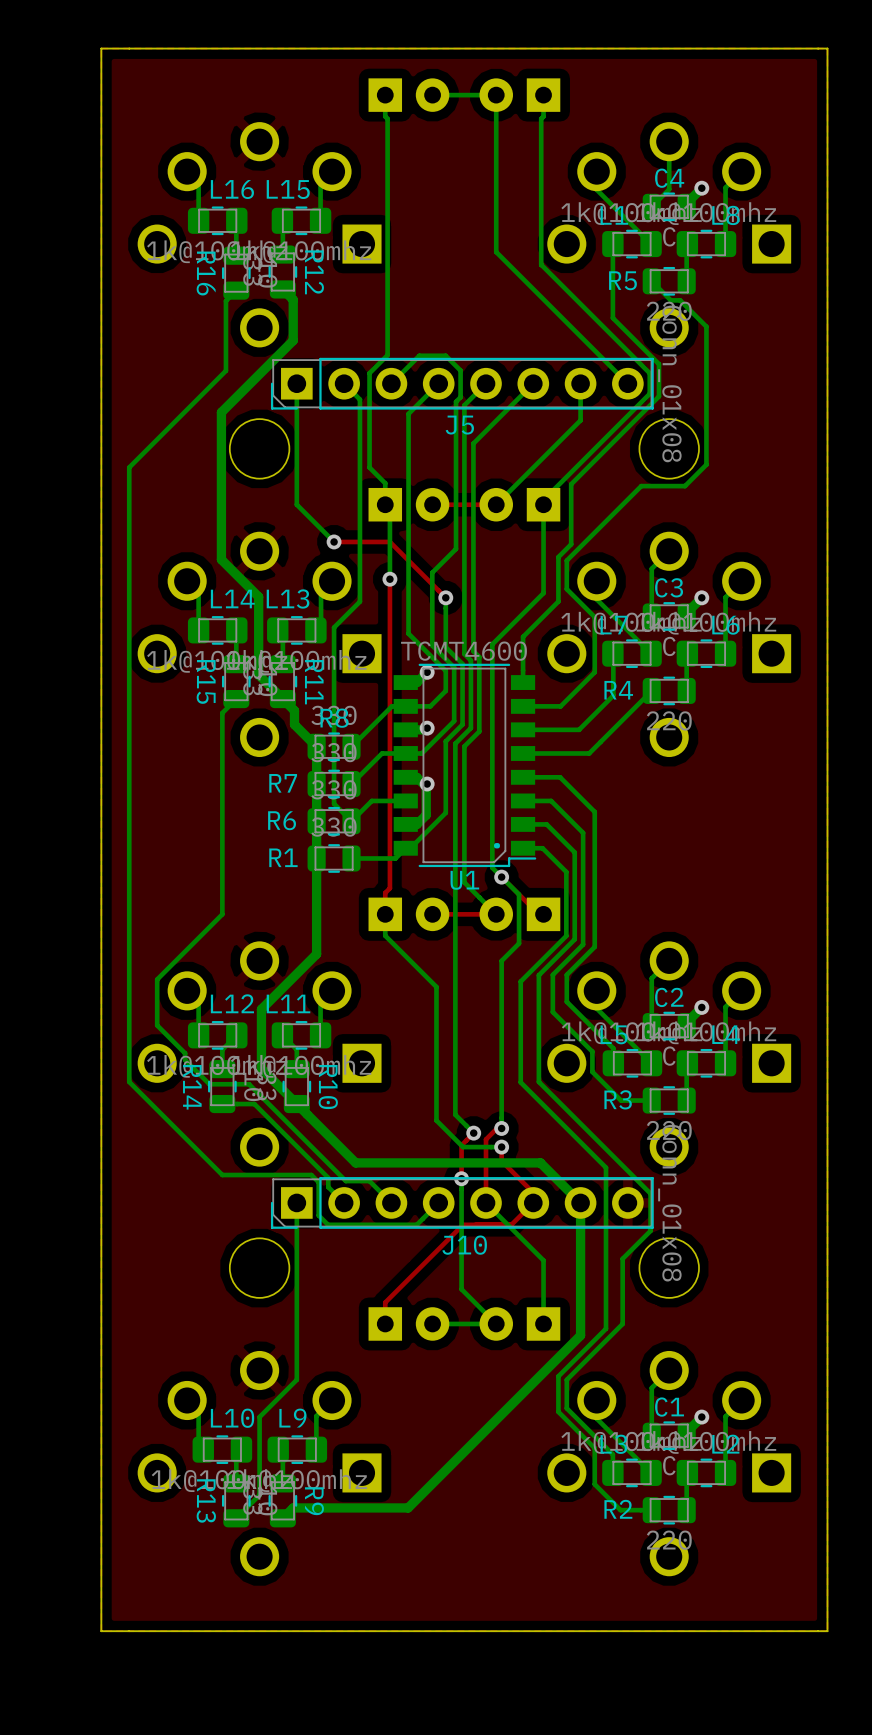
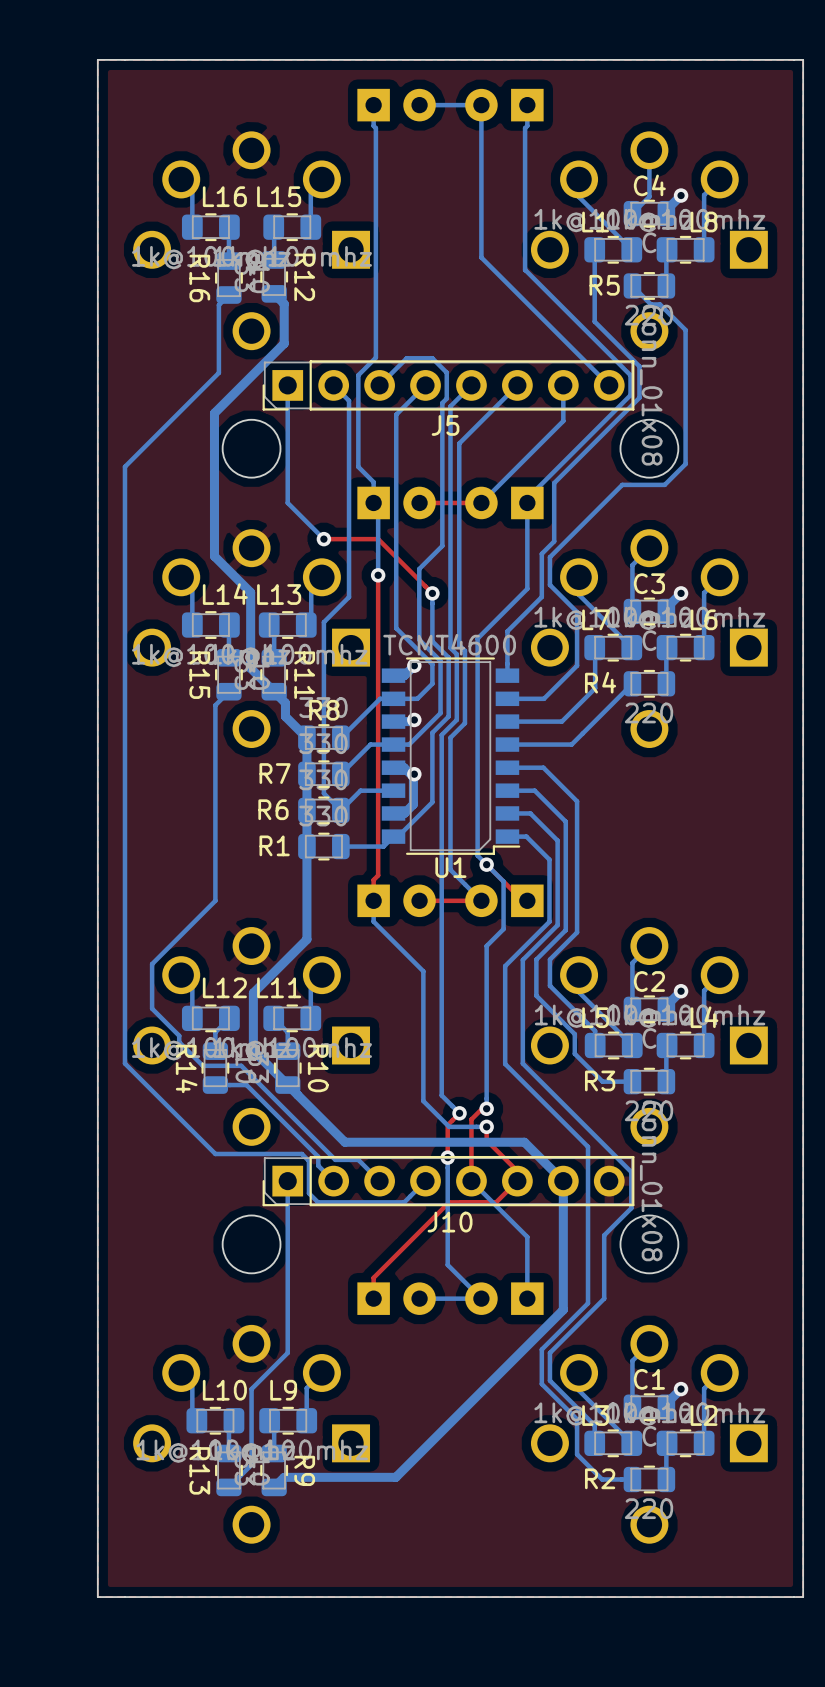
text: . (496, 845) -> none

